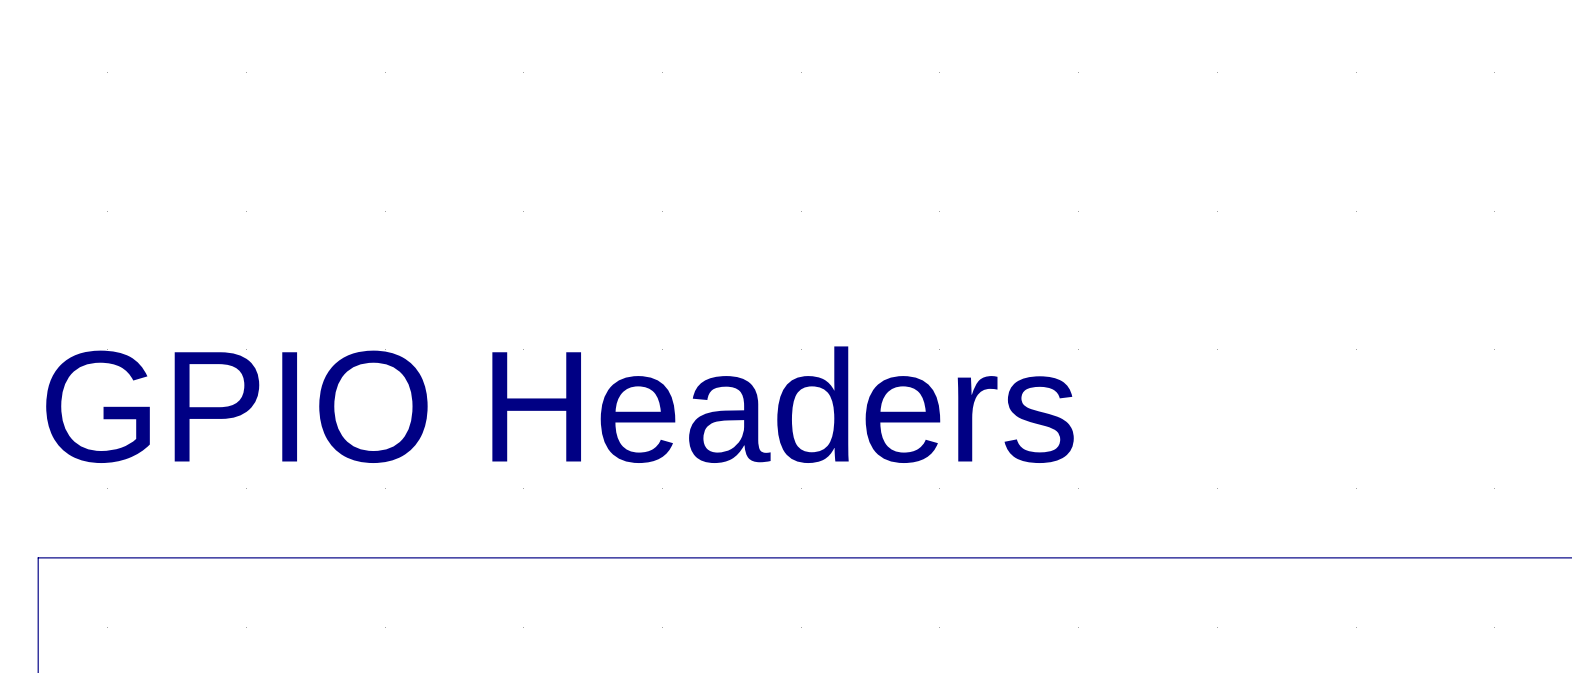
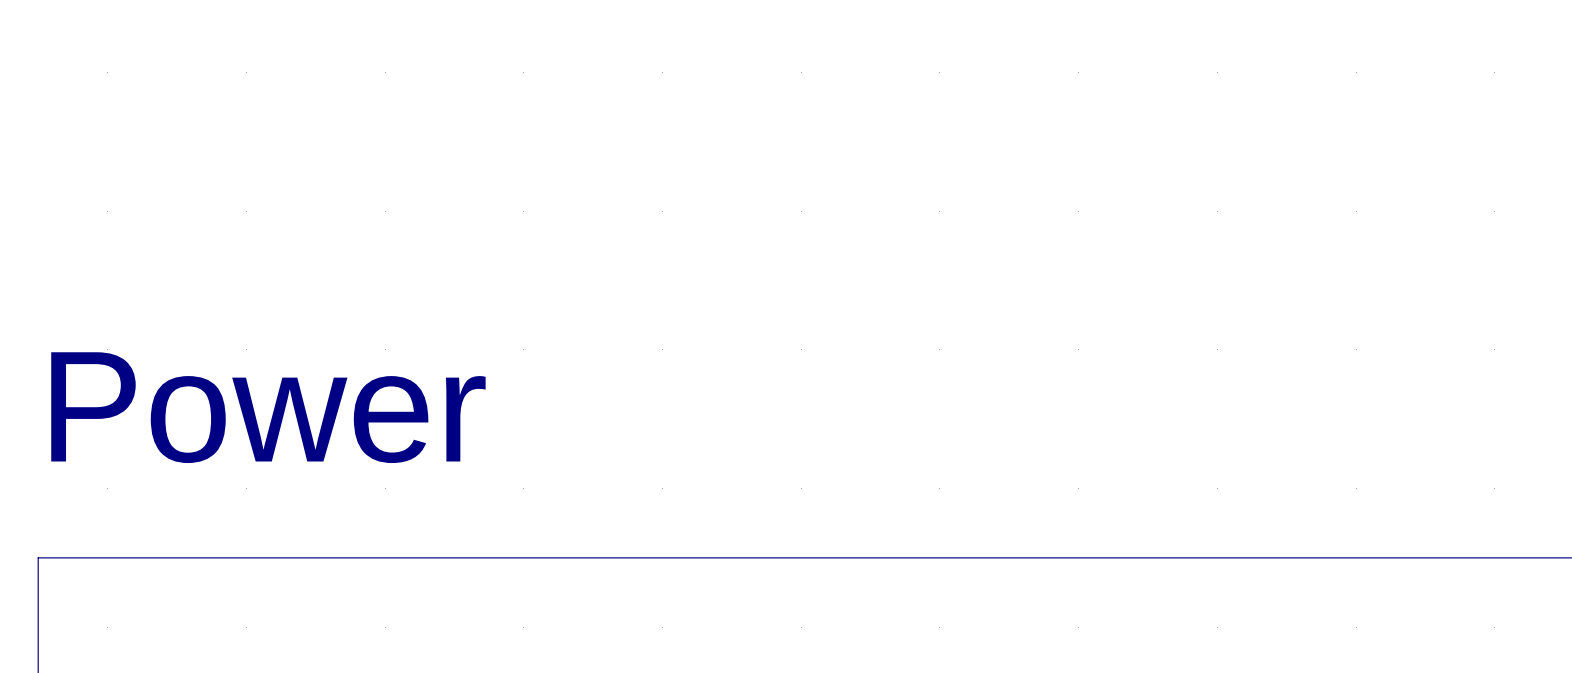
text: GPIO Headers (559, 404) -> Power (268, 407)

